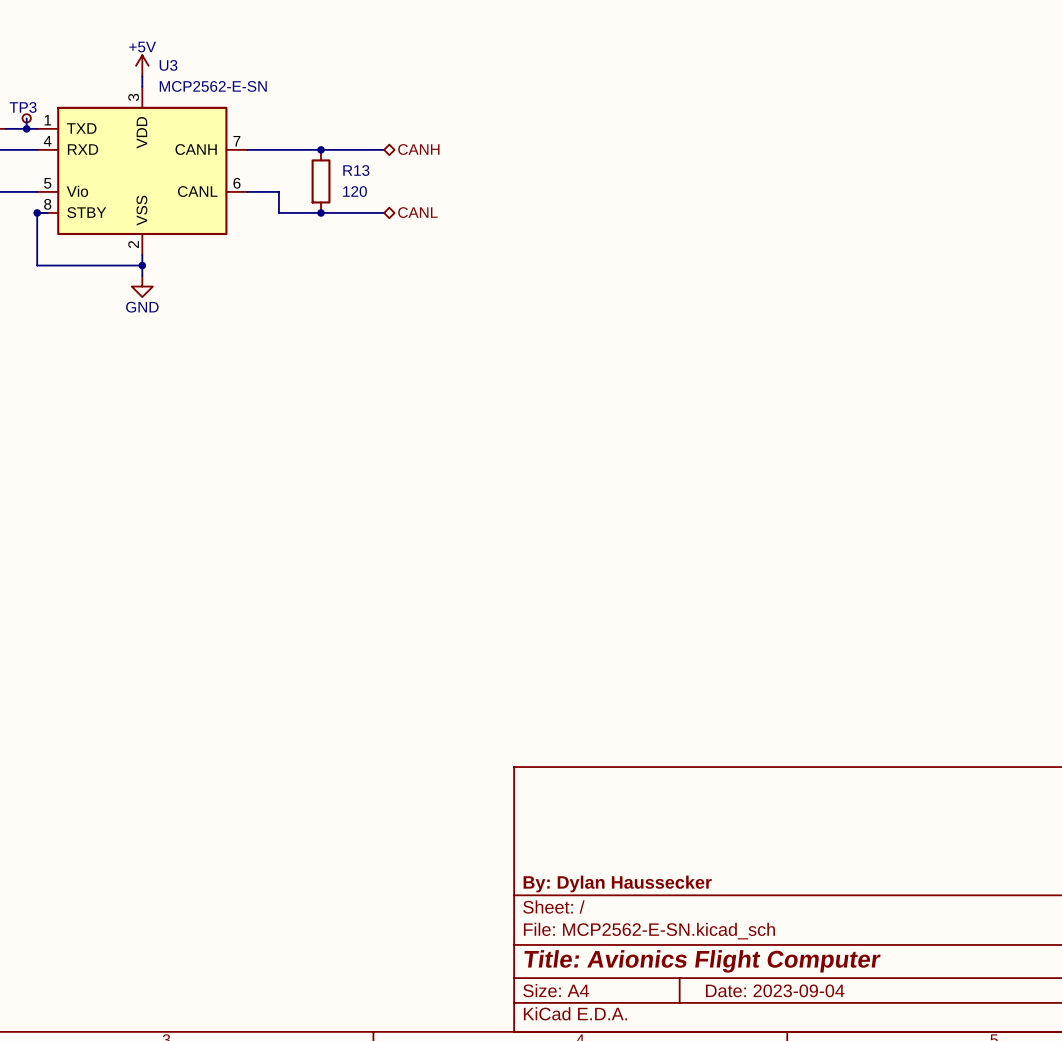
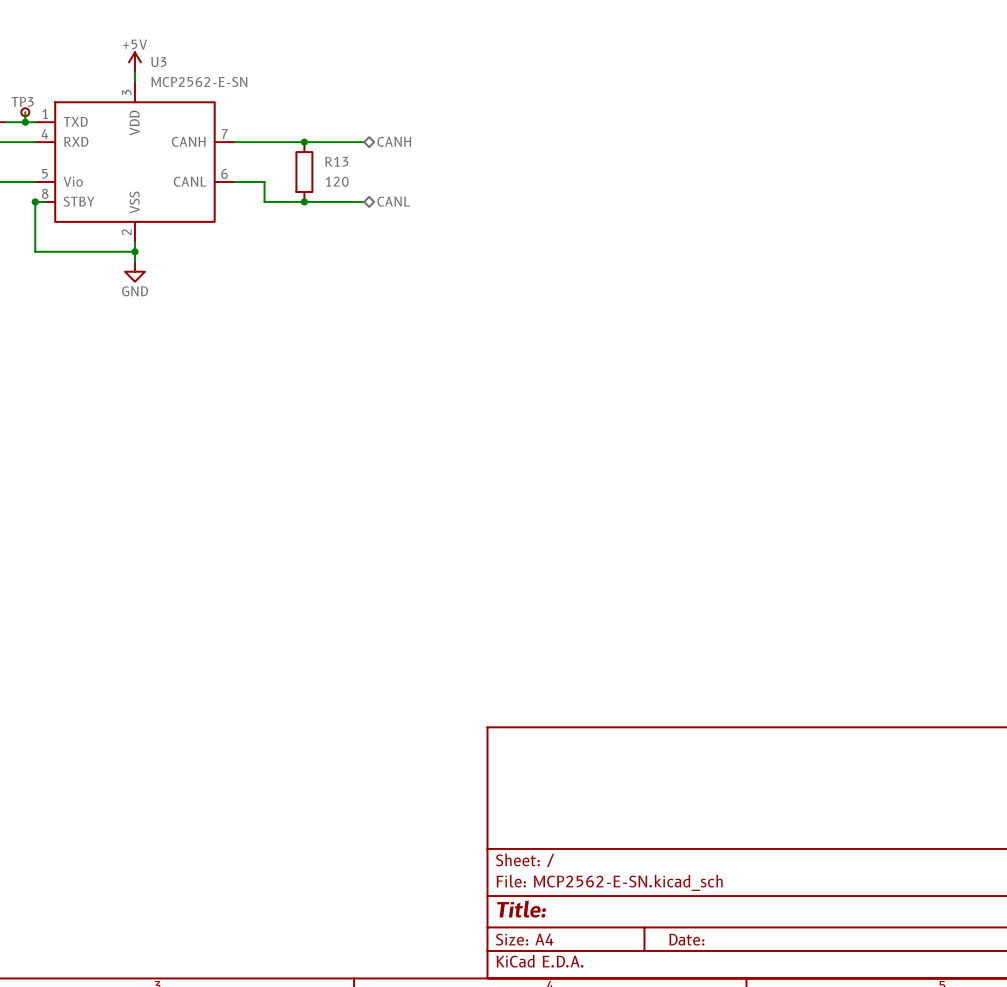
title block: By: Dylan Haussecker (617, 883) -> none
title block: Title: Avionics Flight Computer (702, 961) -> Title: (521, 909)
title block: Date: 2023-09-04 (775, 990) -> Date: (686, 939)

